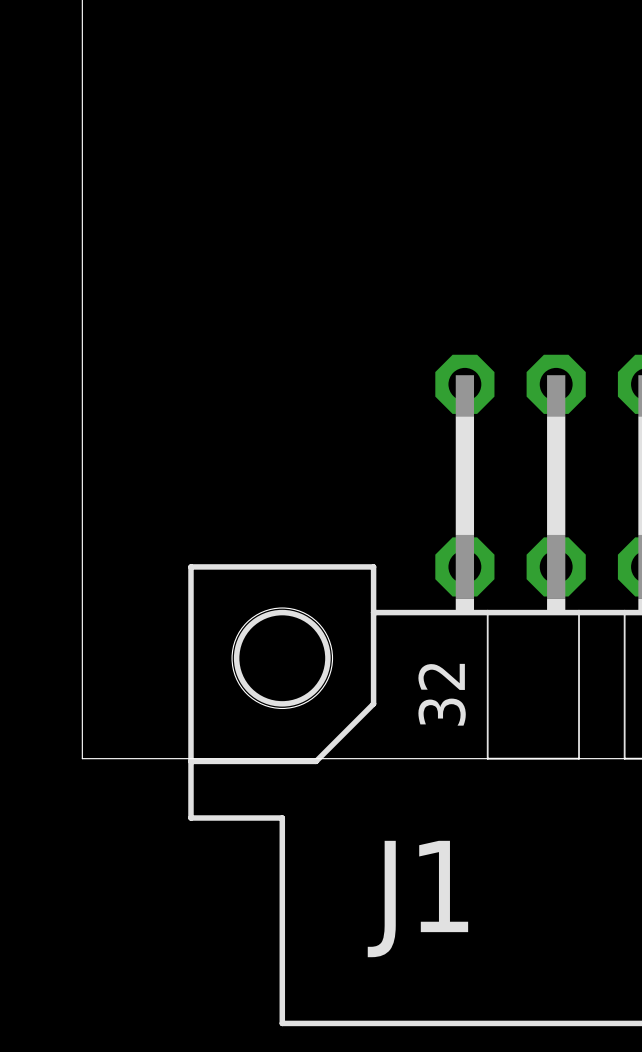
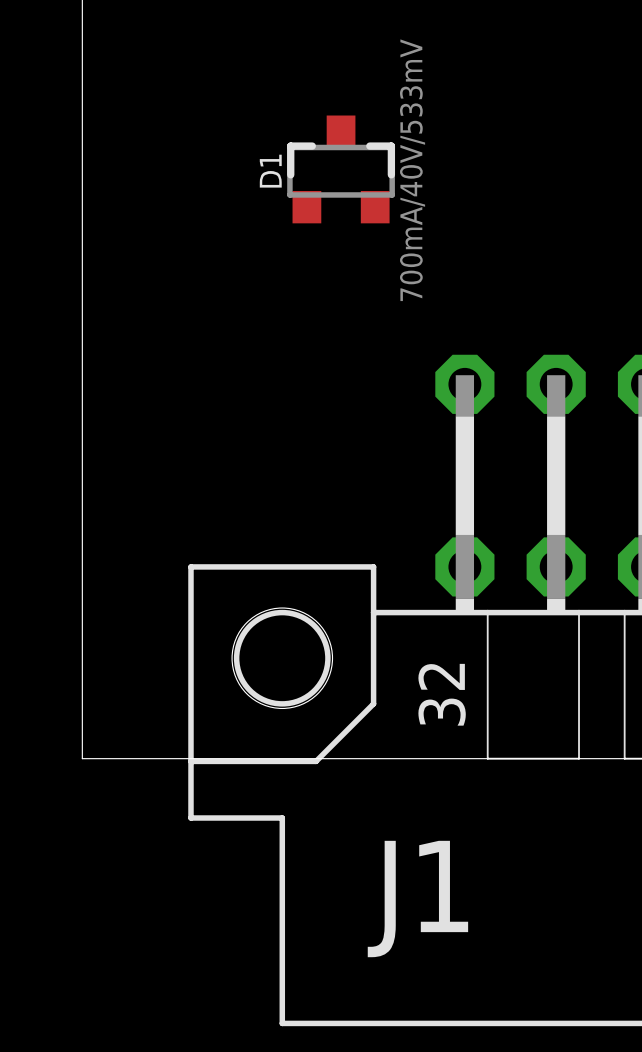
D1: none -> 700mA/40V/533mV (341, 169)

